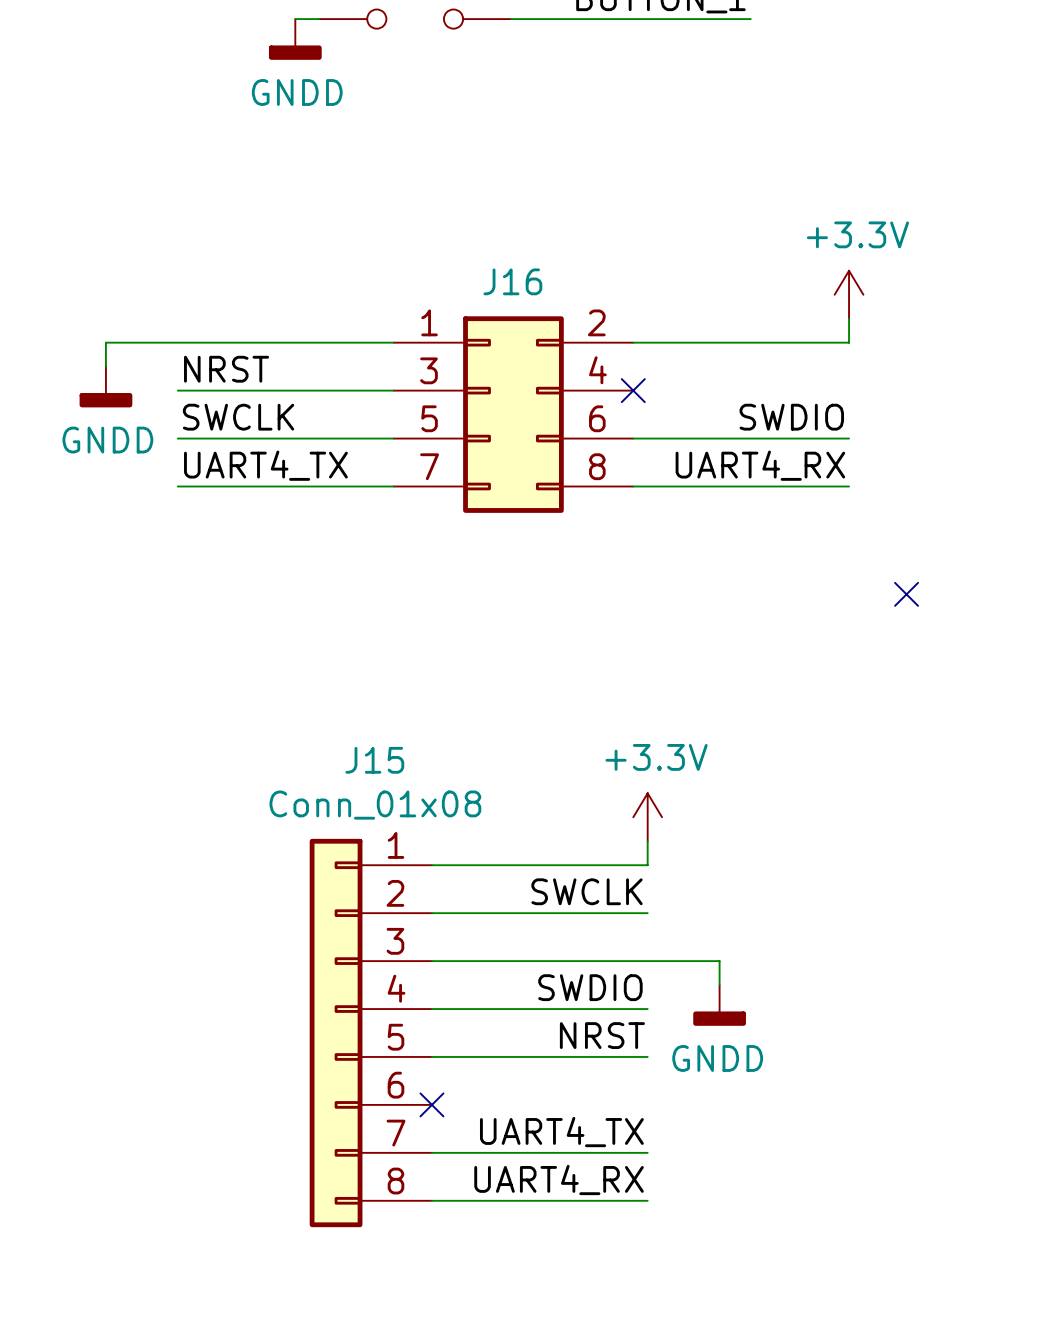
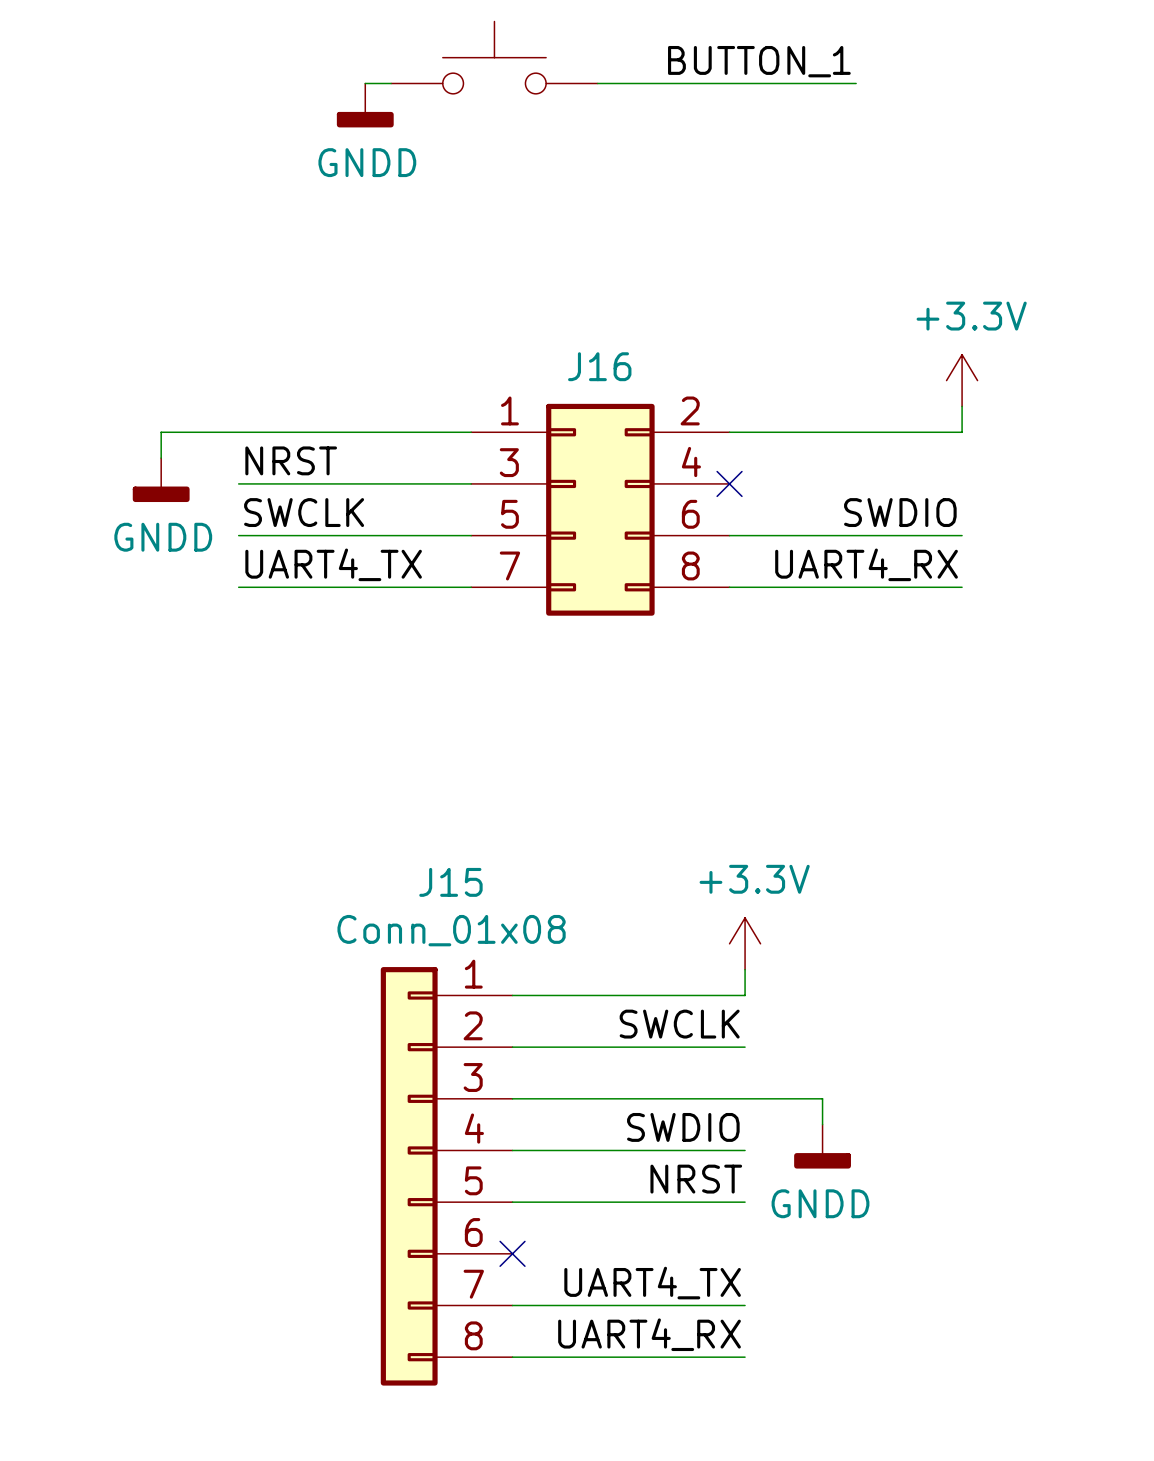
no-connect mark: (906, 594) -> none

